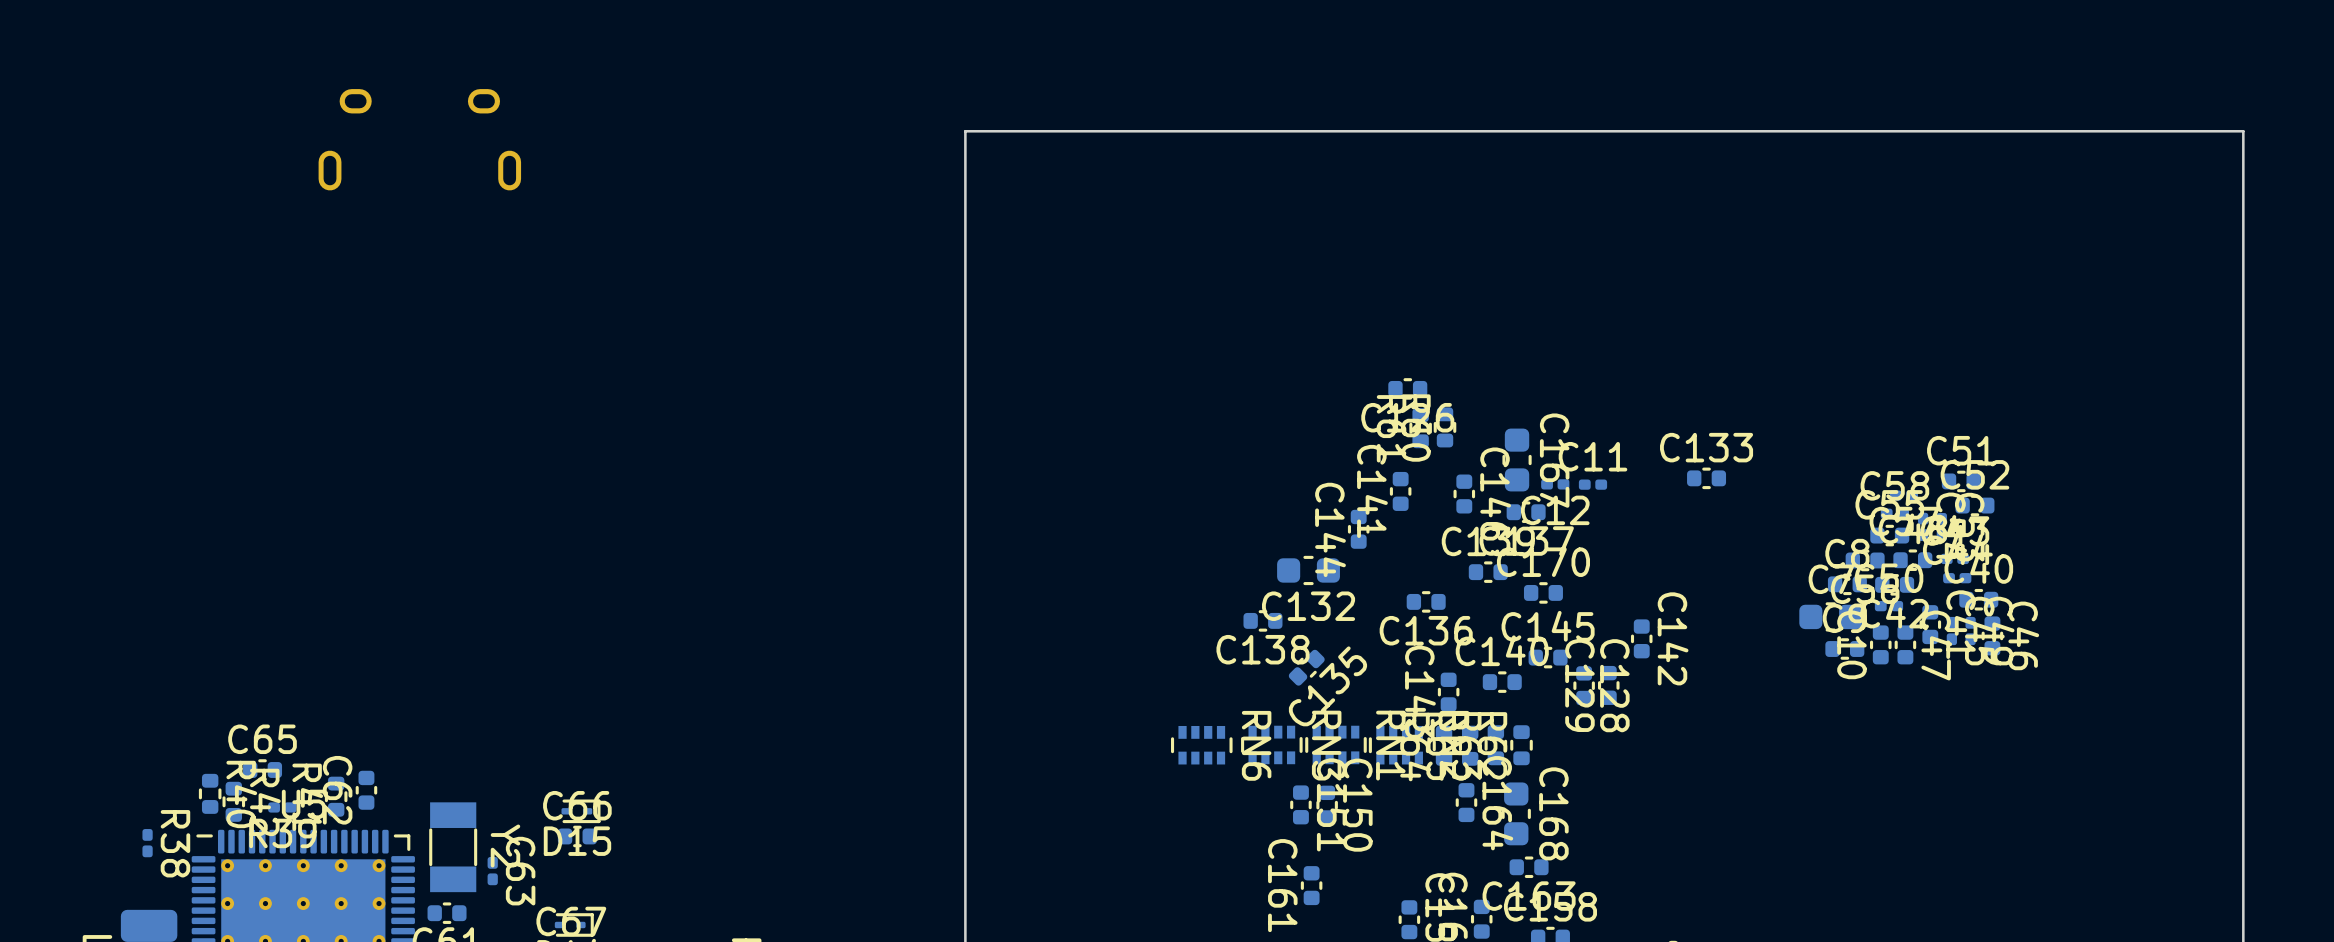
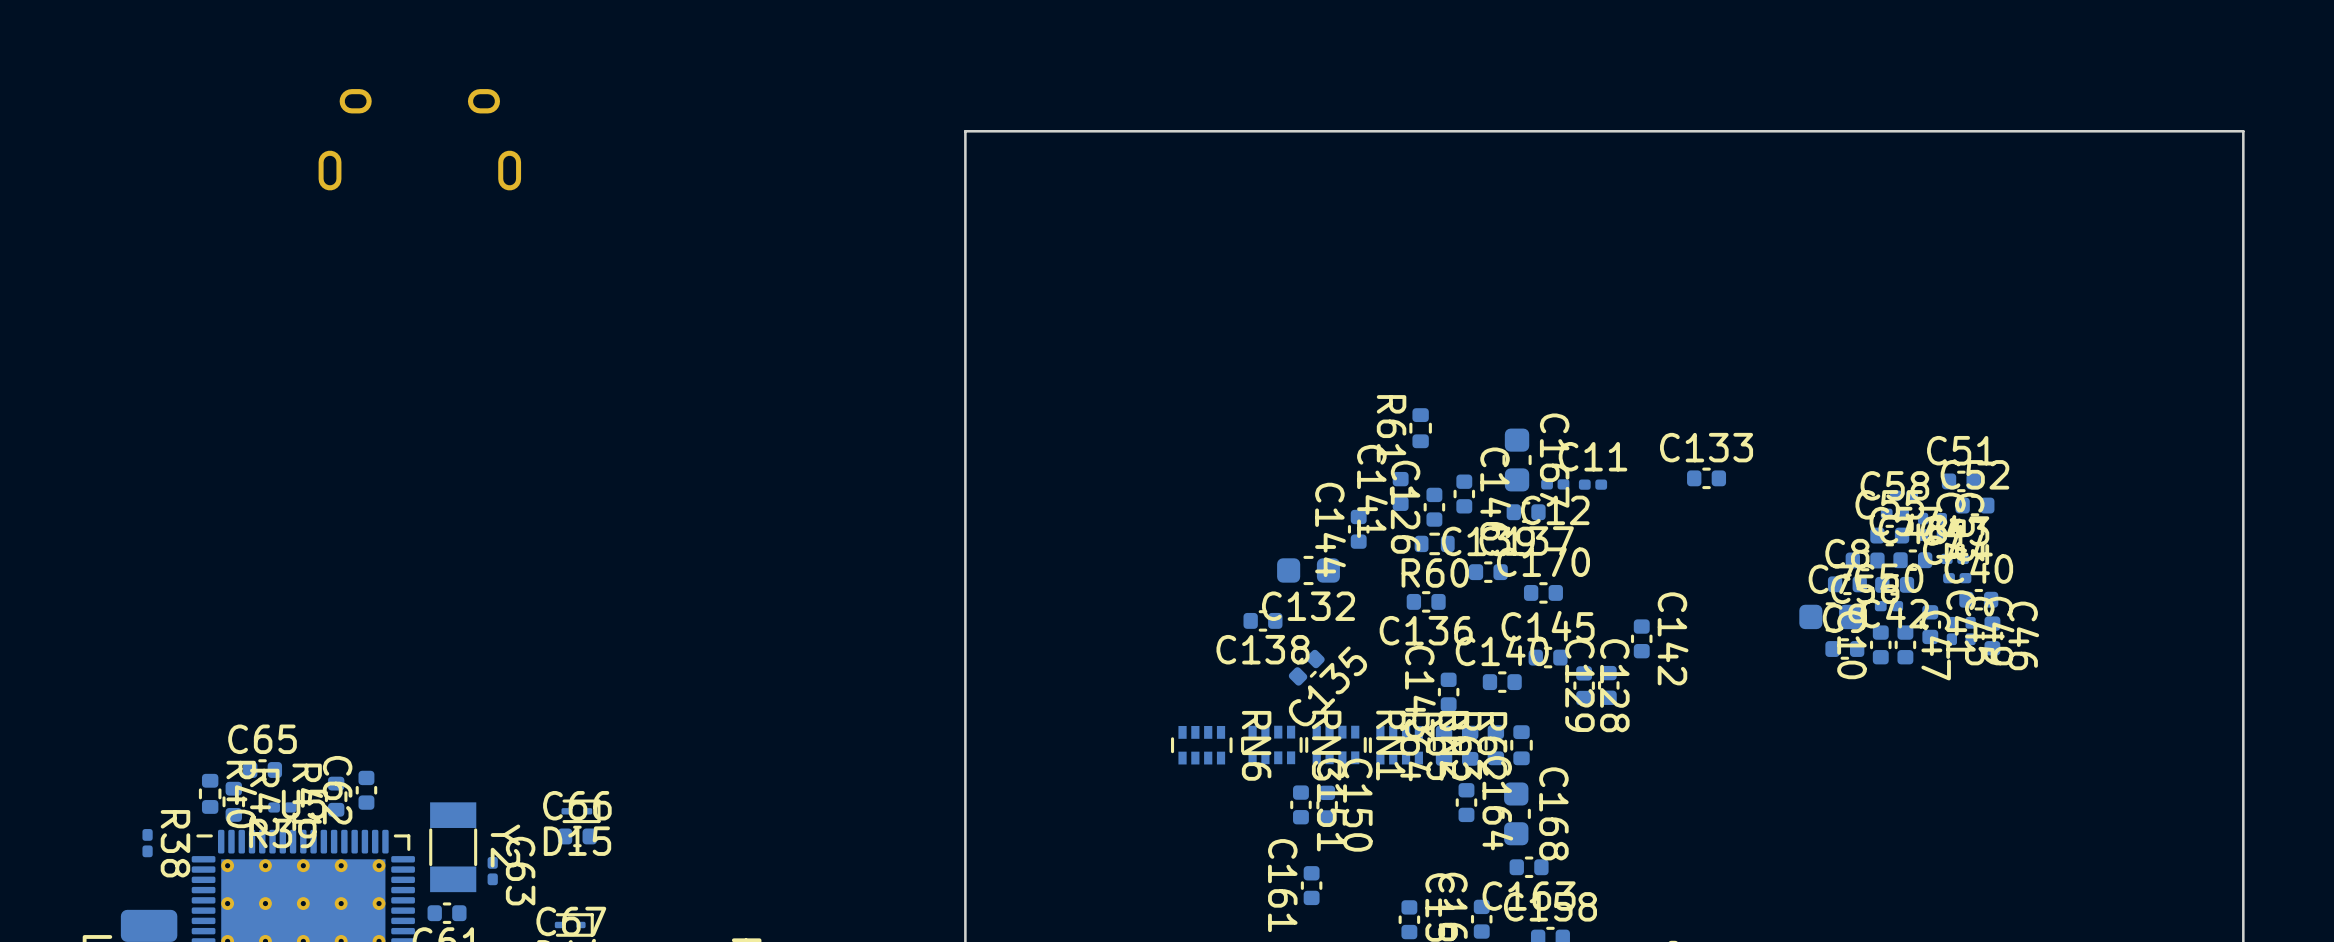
C126 rotation: 0° (1407, 388) -> 90° clockwise (1434, 507)
C126 position: (1407, 388) -> (1434, 507)
R60 rotation: 0° (1445, 427) -> 90° clockwise (1434, 543)
R60 position: (1445, 427) -> (1434, 543)

